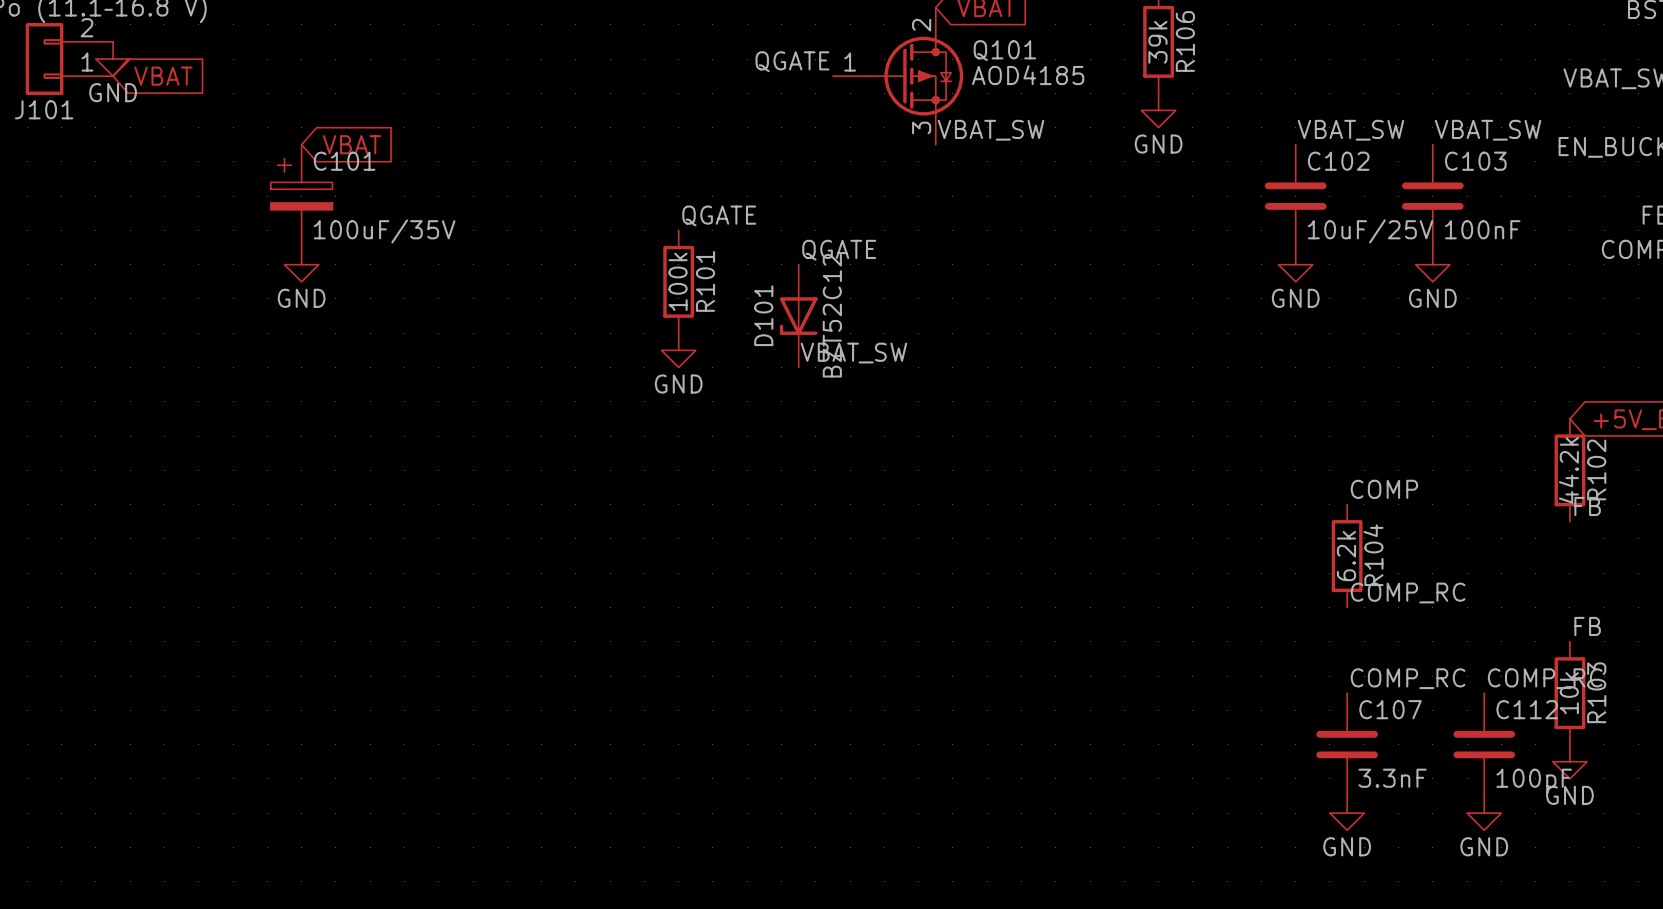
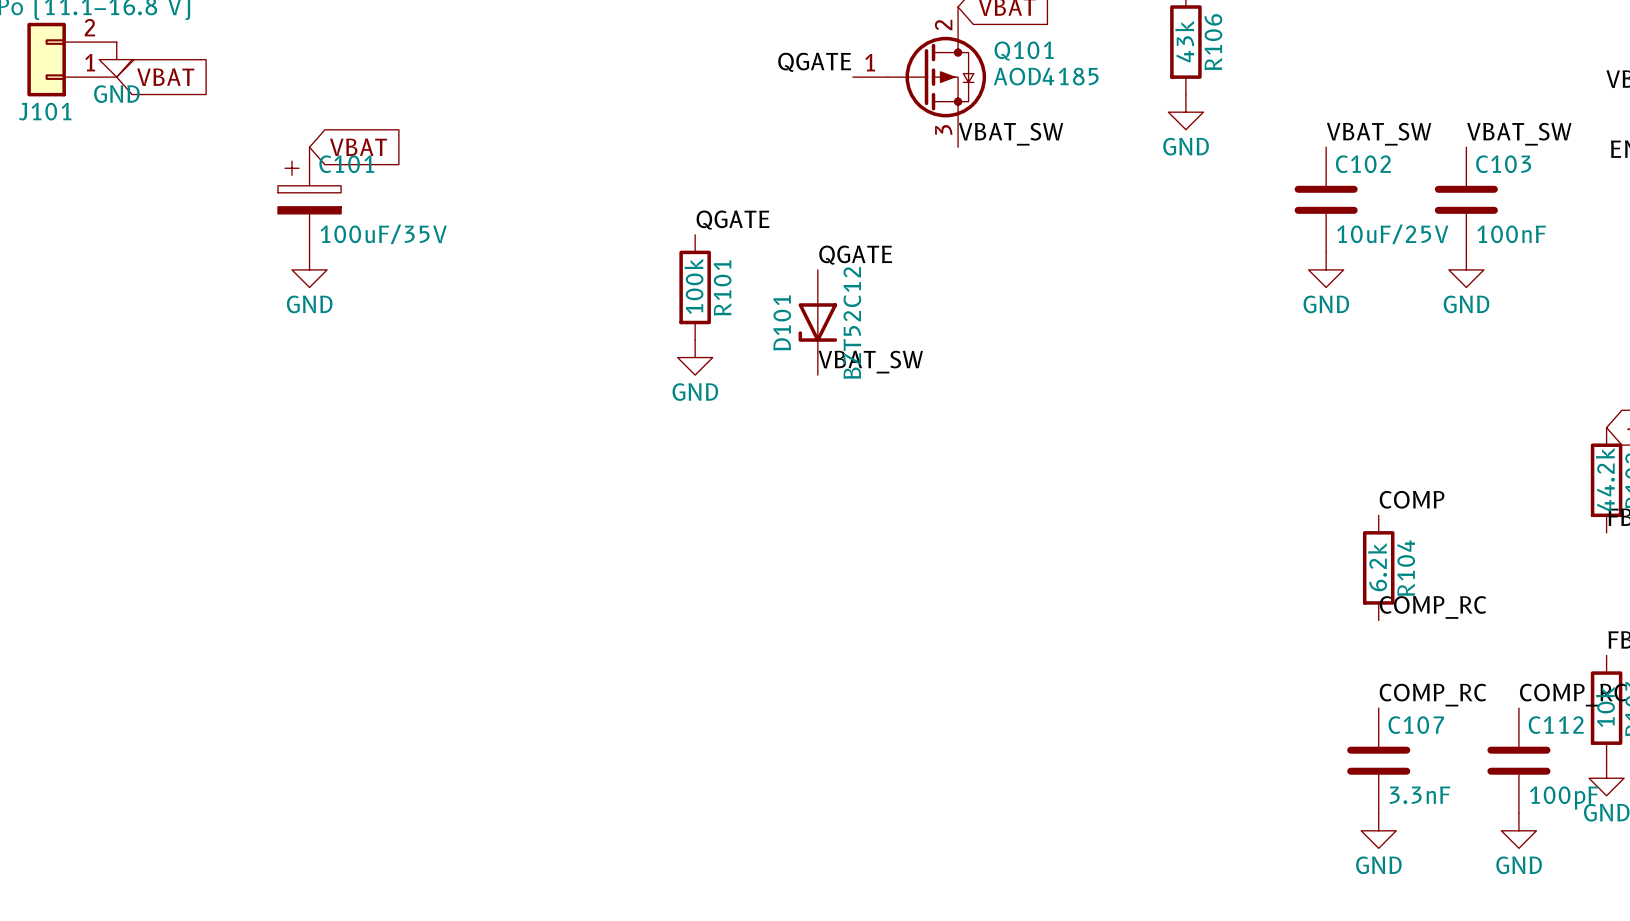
R106 value: 39k (1157, 42) -> 43k (1184, 41)

